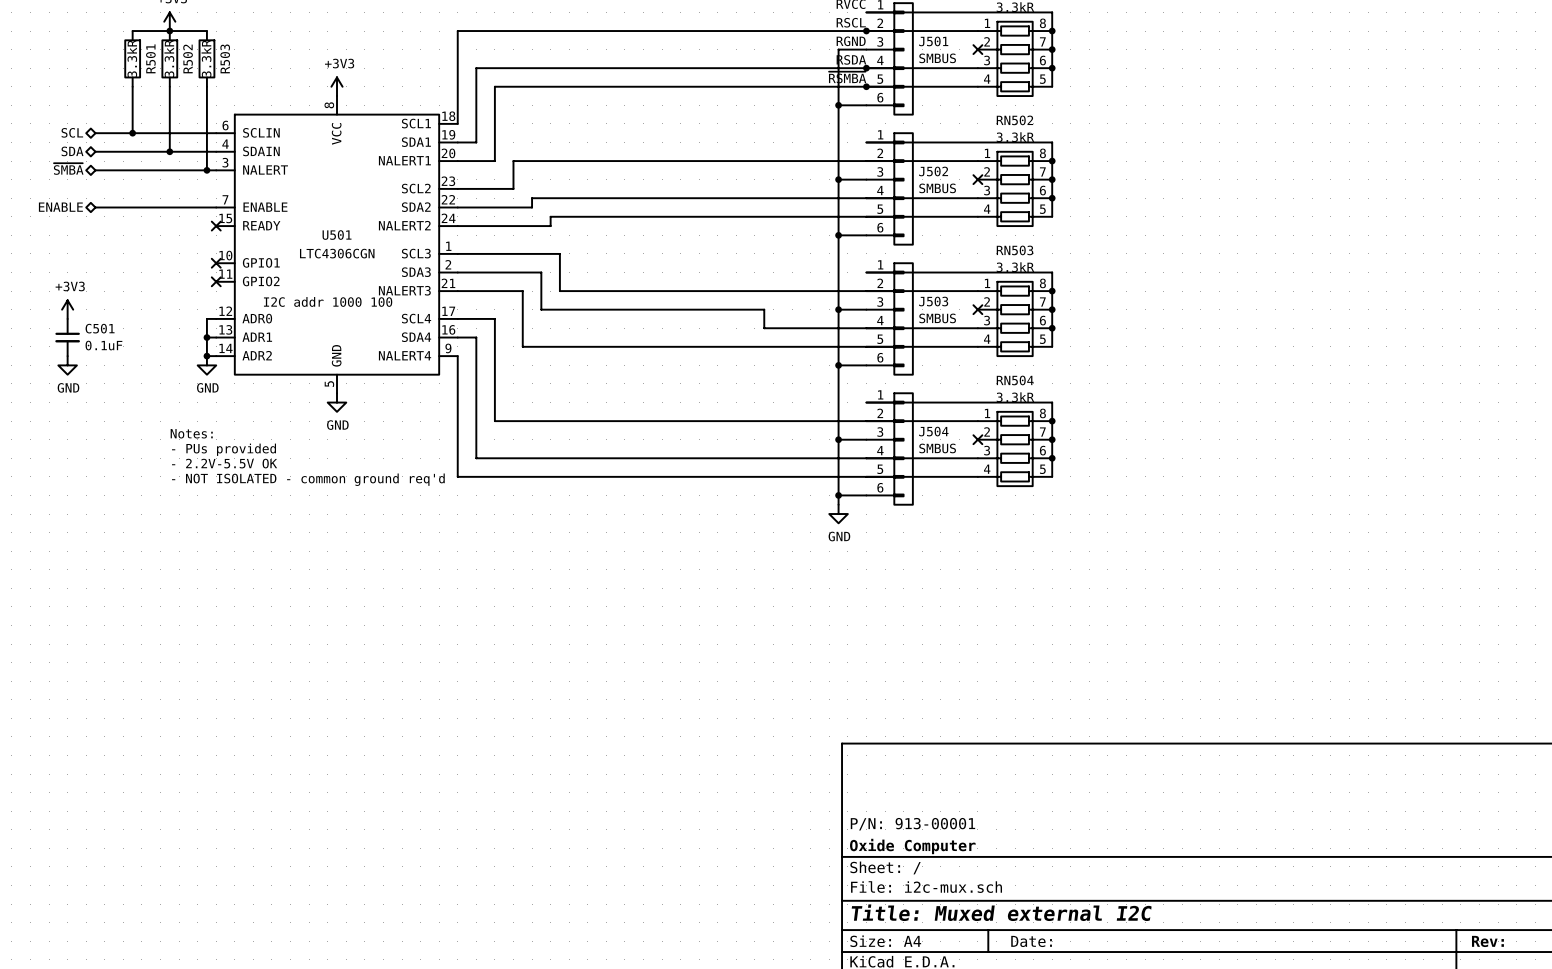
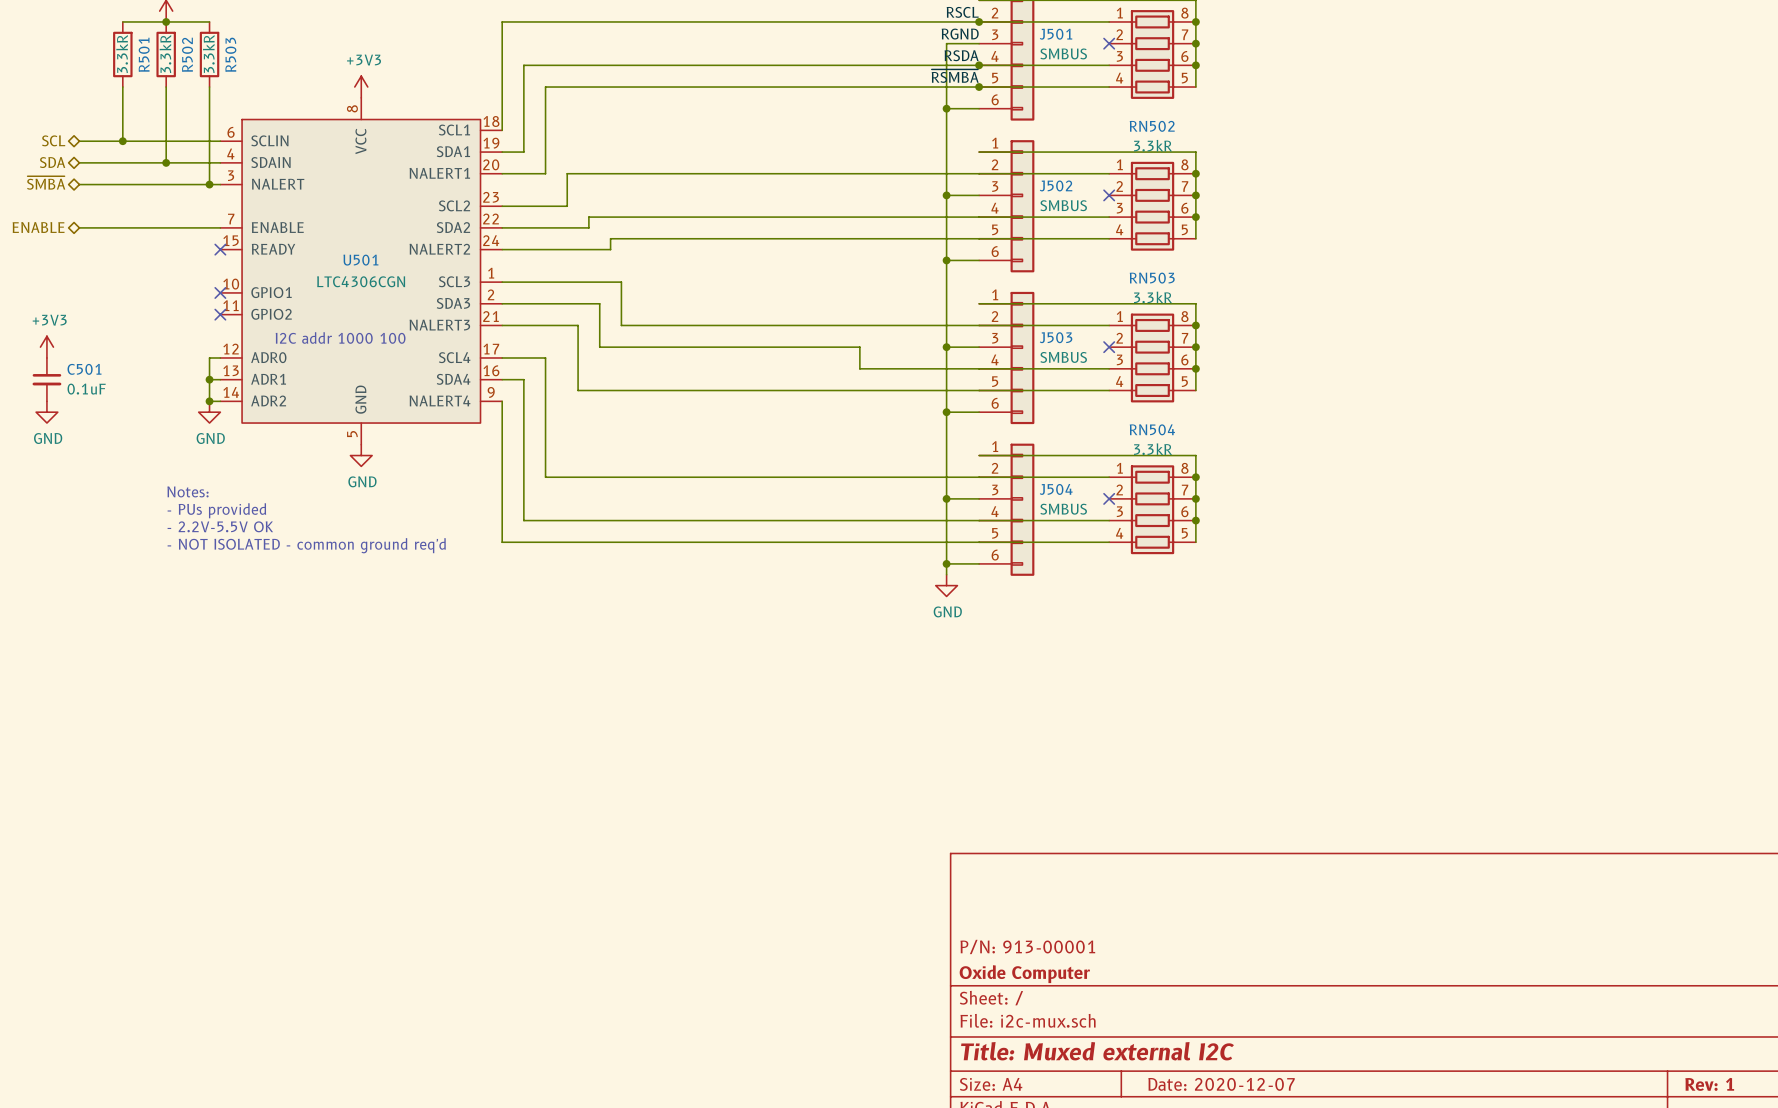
title block: Date: (1031, 941) -> Date: 2020-12-07 (1221, 1084)
title block: Rev: (1487, 941) -> Rev: 1 (1709, 1084)

